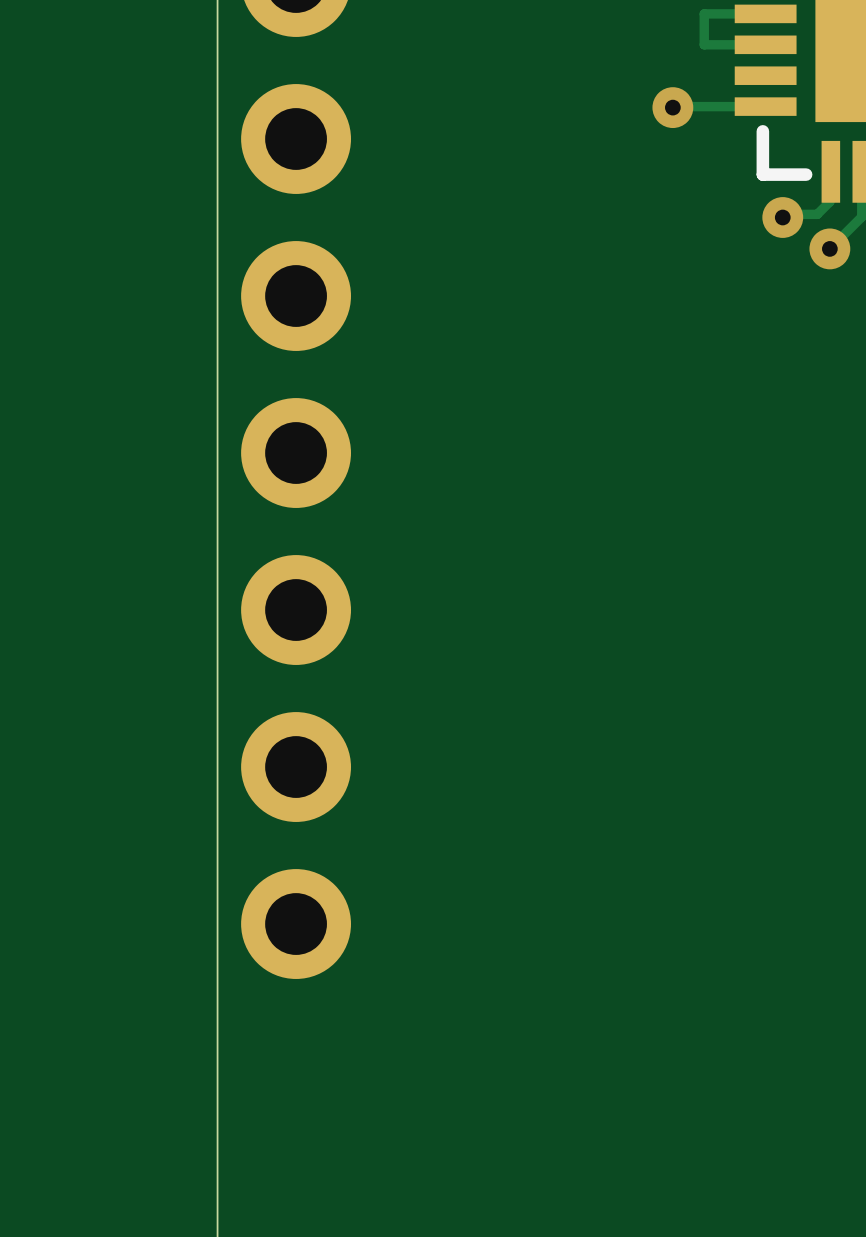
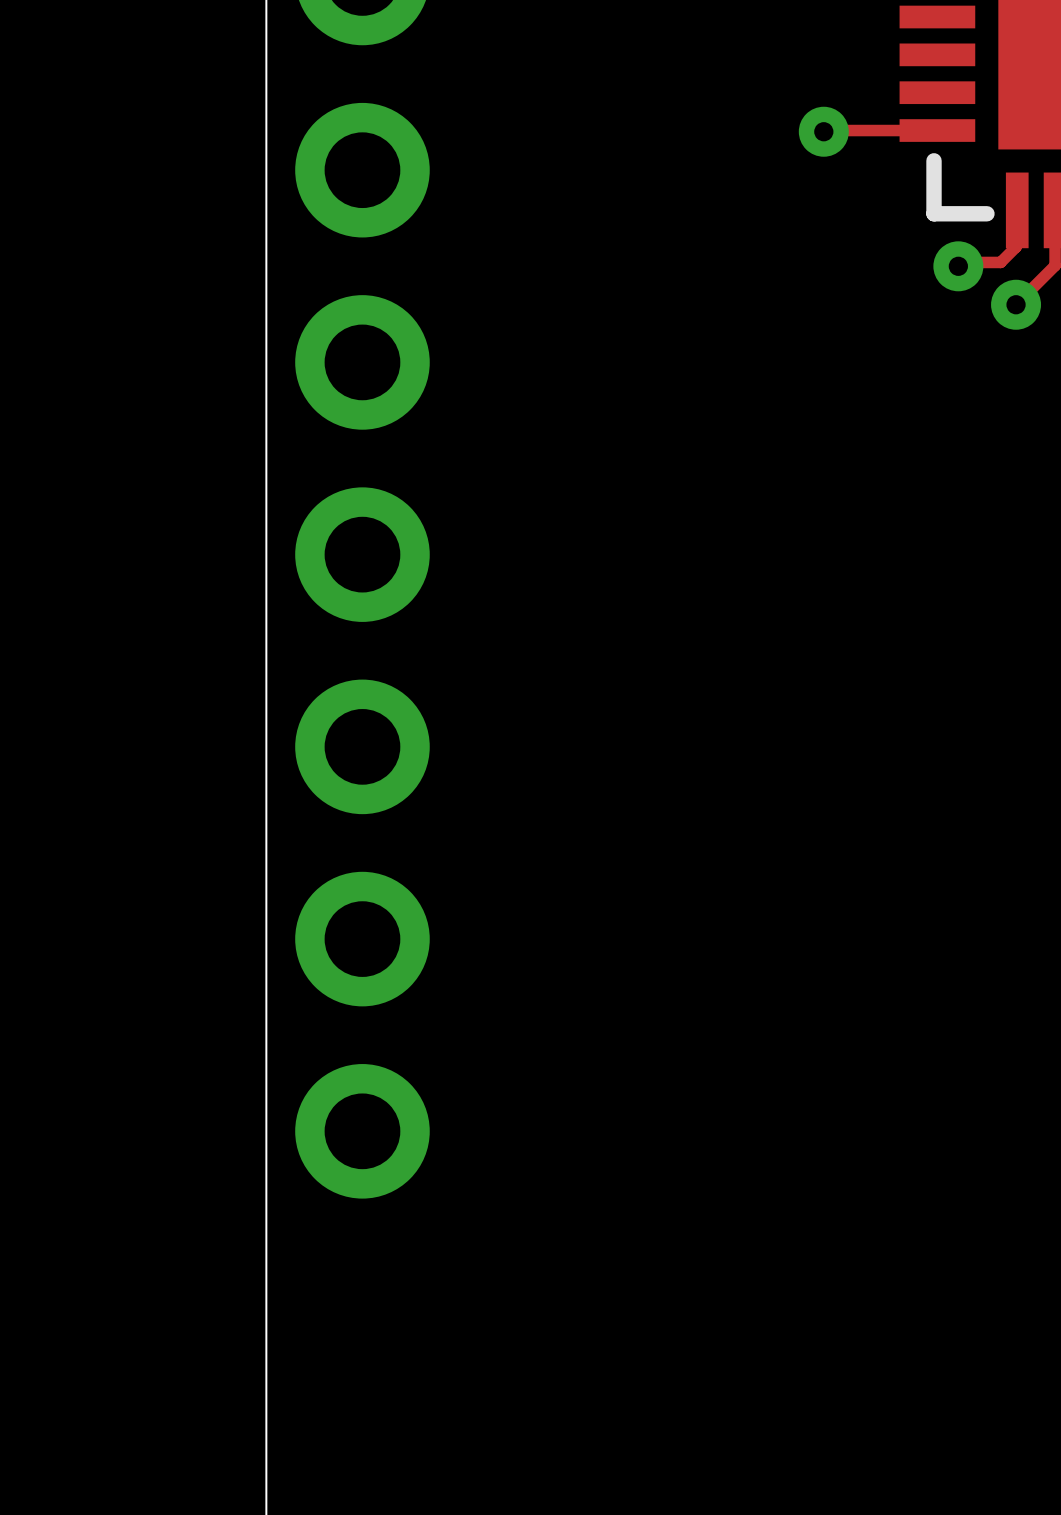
track: (765, 13) (704, 13) (704, 44) (765, 44) -> none

